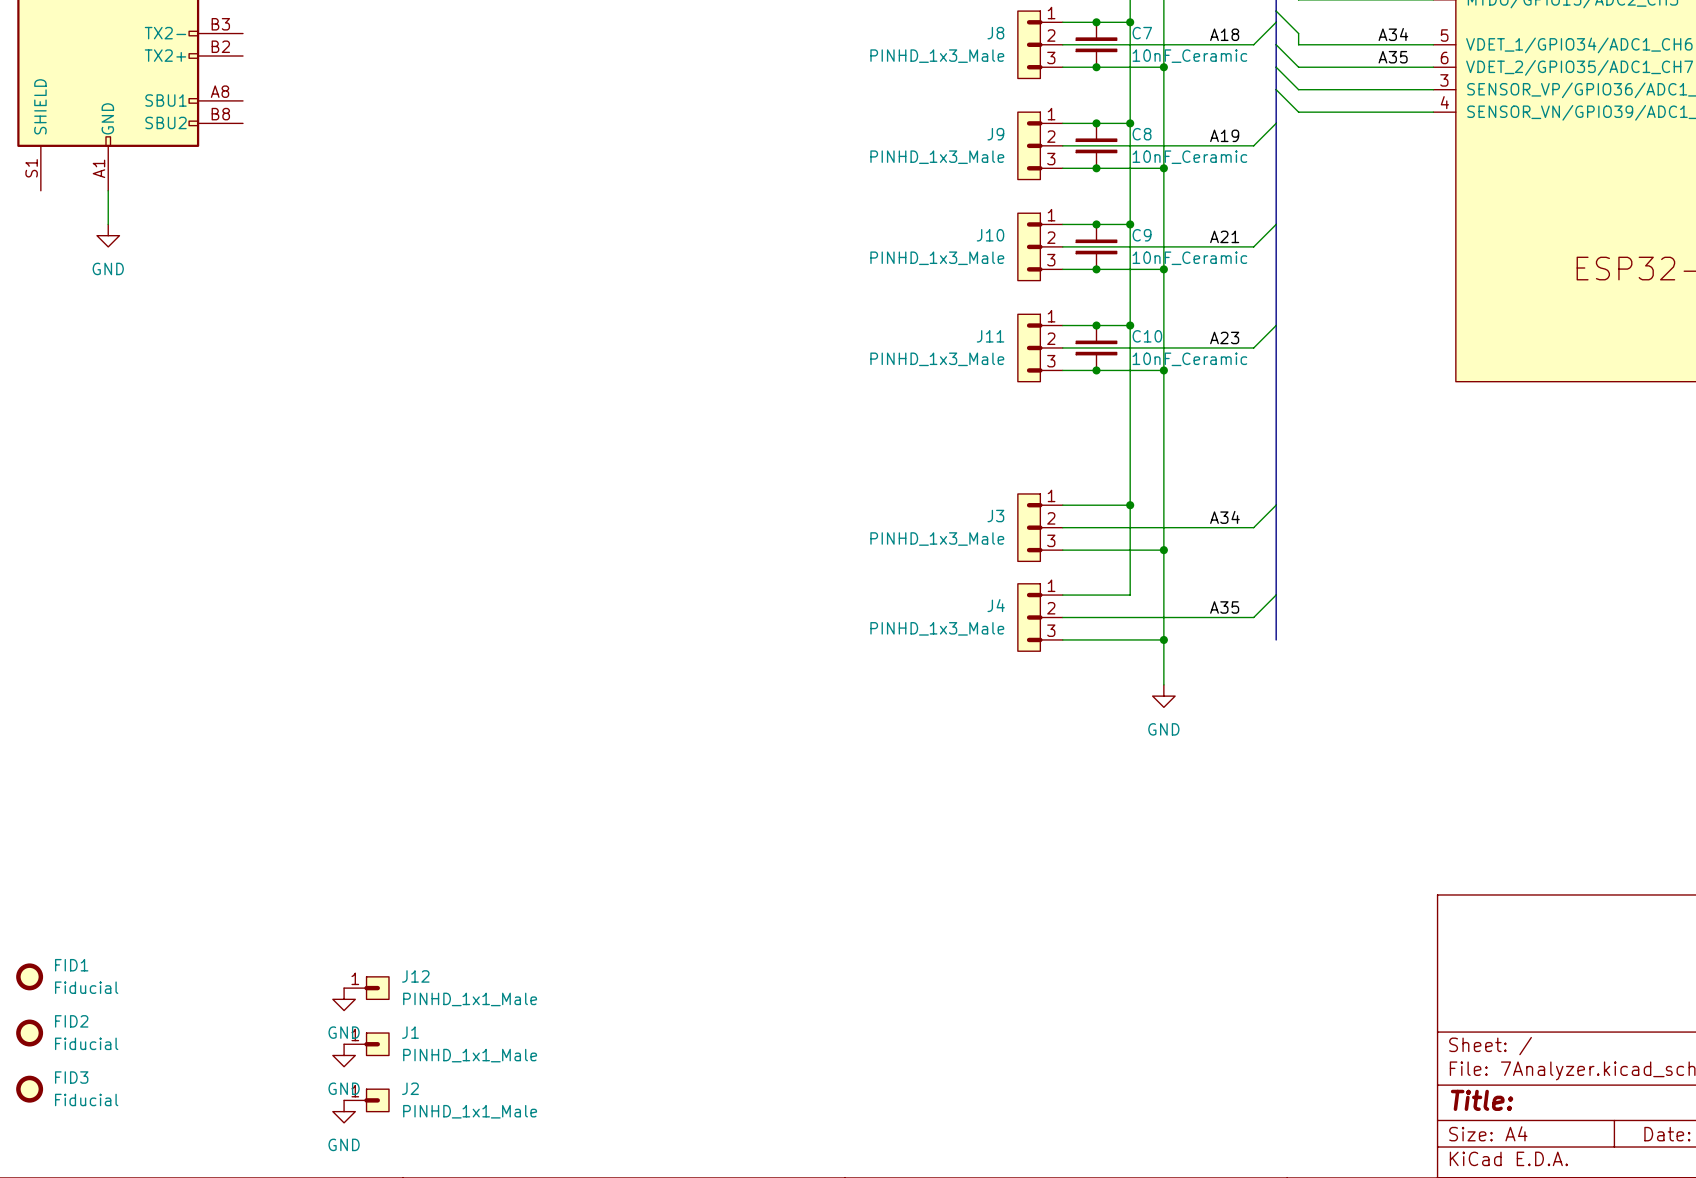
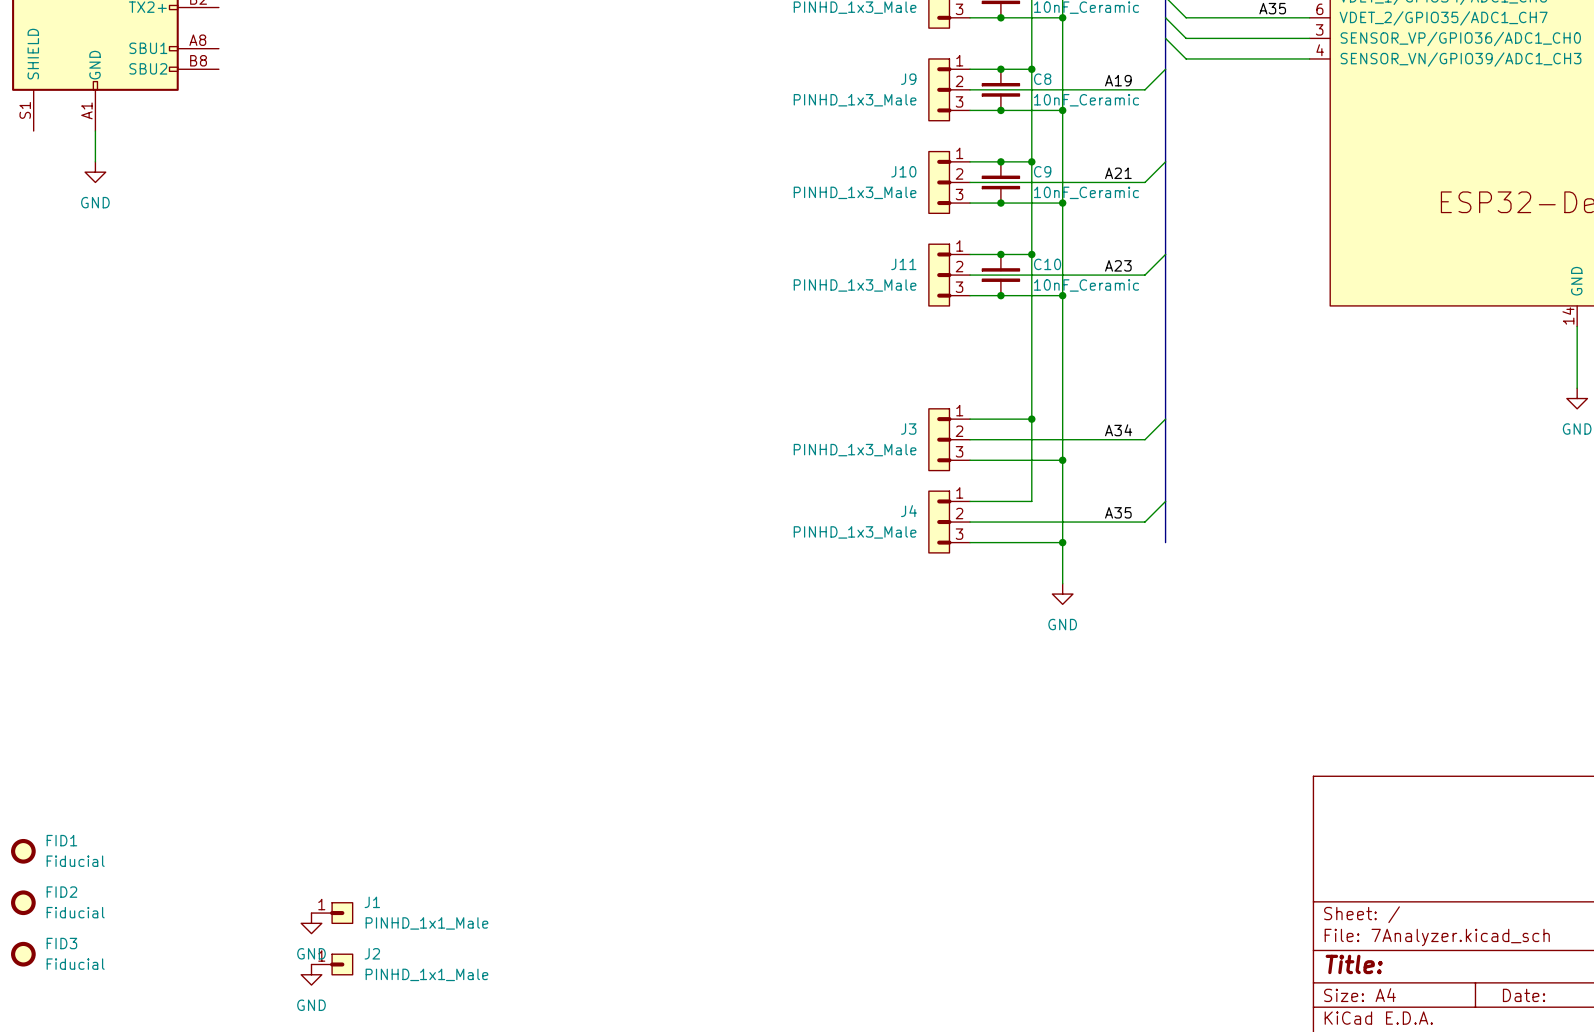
J12: PINHD_1x1_Male (366, 988) -> none
power symbol: GND (344, 999) -> none

